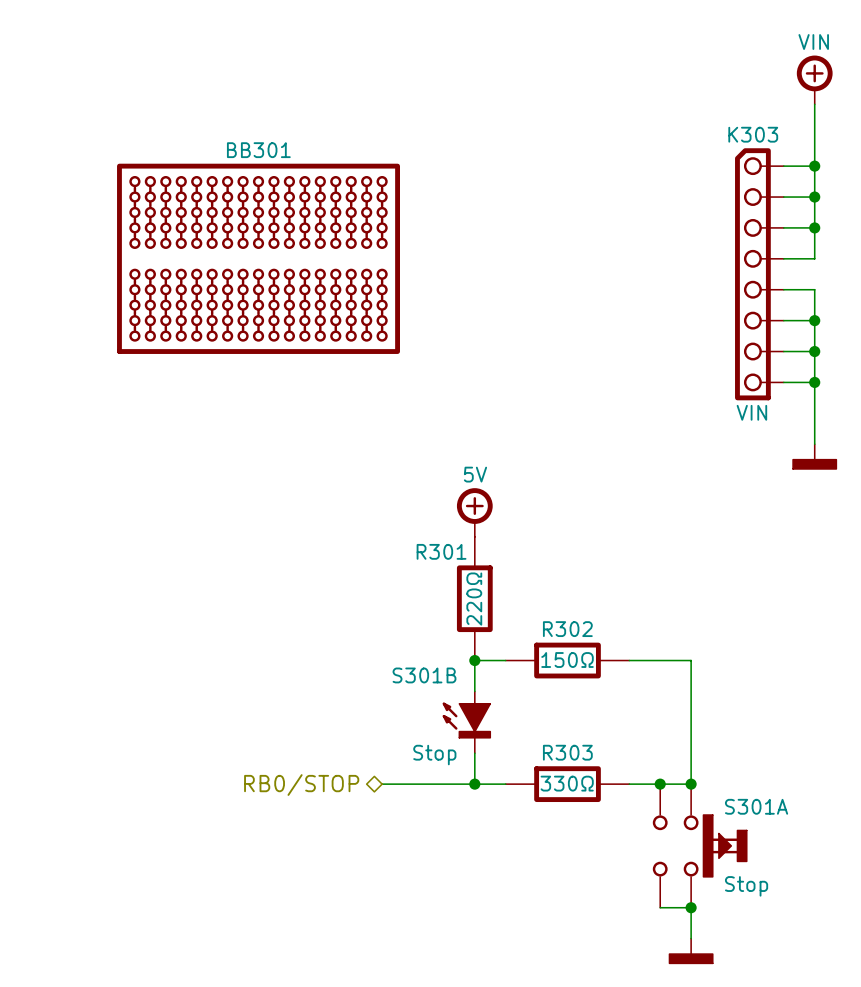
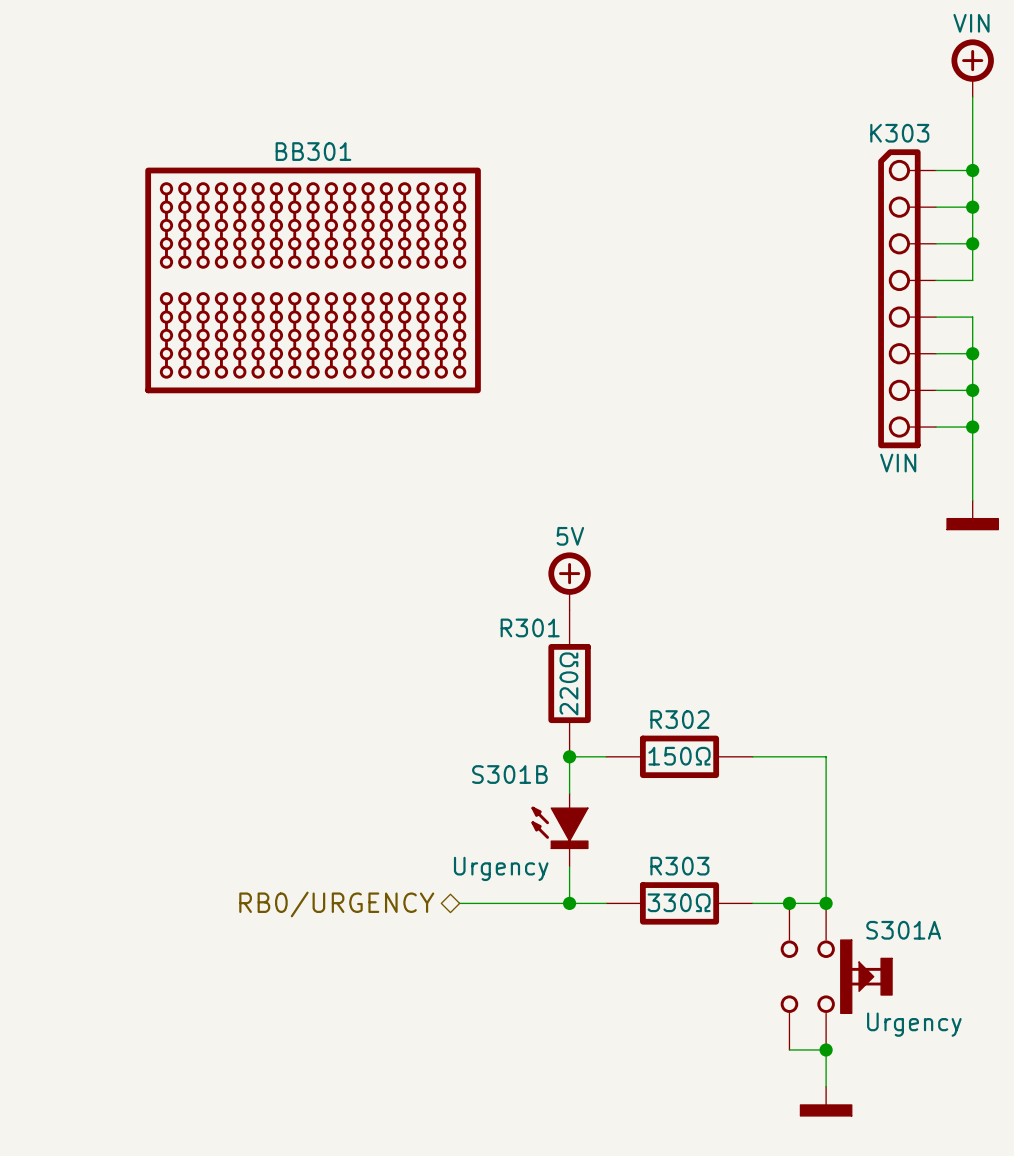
S301B value: Stop (434, 755) -> Urgency (501, 868)
hierarchical label: RB0/STOP (301, 785) -> RB0/URGENCY (336, 904)
S301A value: Stop (746, 886) -> Urgency (914, 1024)

